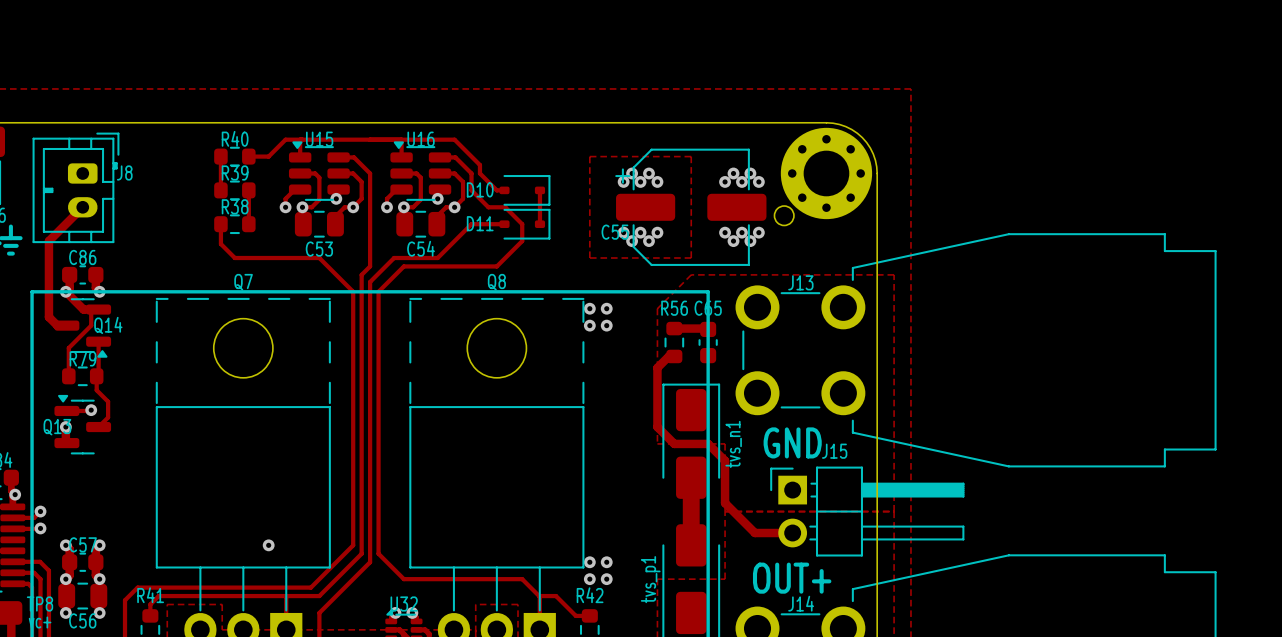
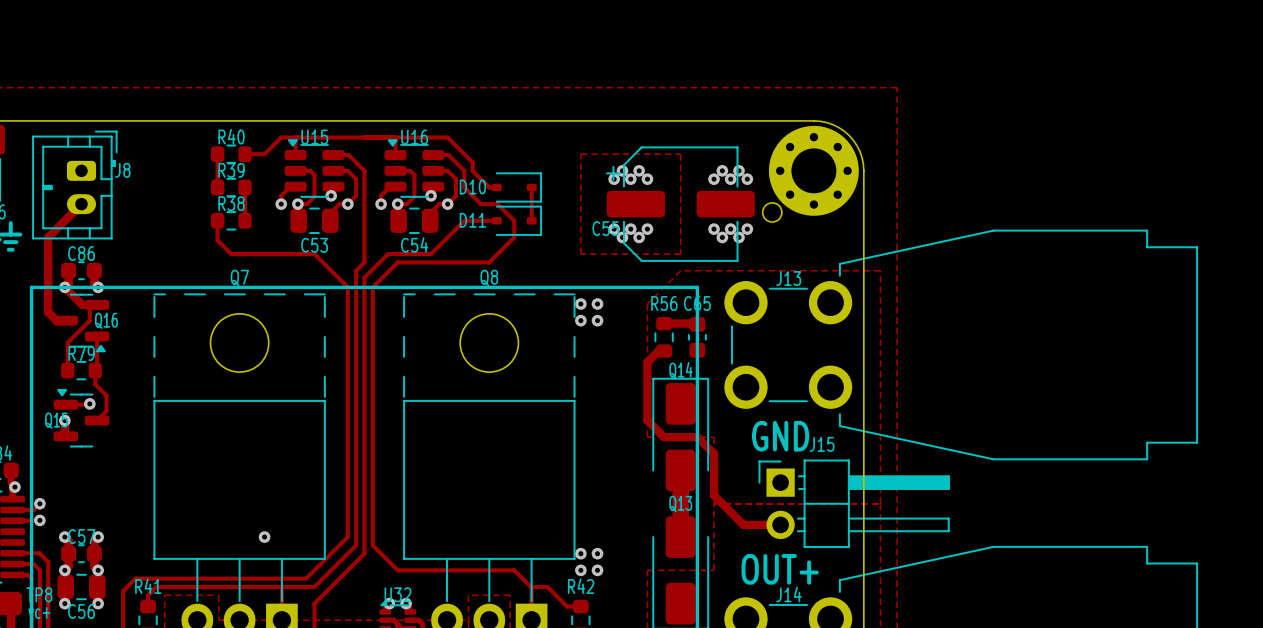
Q14 name: Q14 (108, 325) -> Q16 (106, 320)
Q13 name: Q13 (57, 427) -> Q15 (56, 420)
tvs_n1 name: tvs_n1 (733, 444) -> Q14 (680, 370)
tvs_p1 name: tvs_p1 (650, 579) -> Q13 (680, 503)

